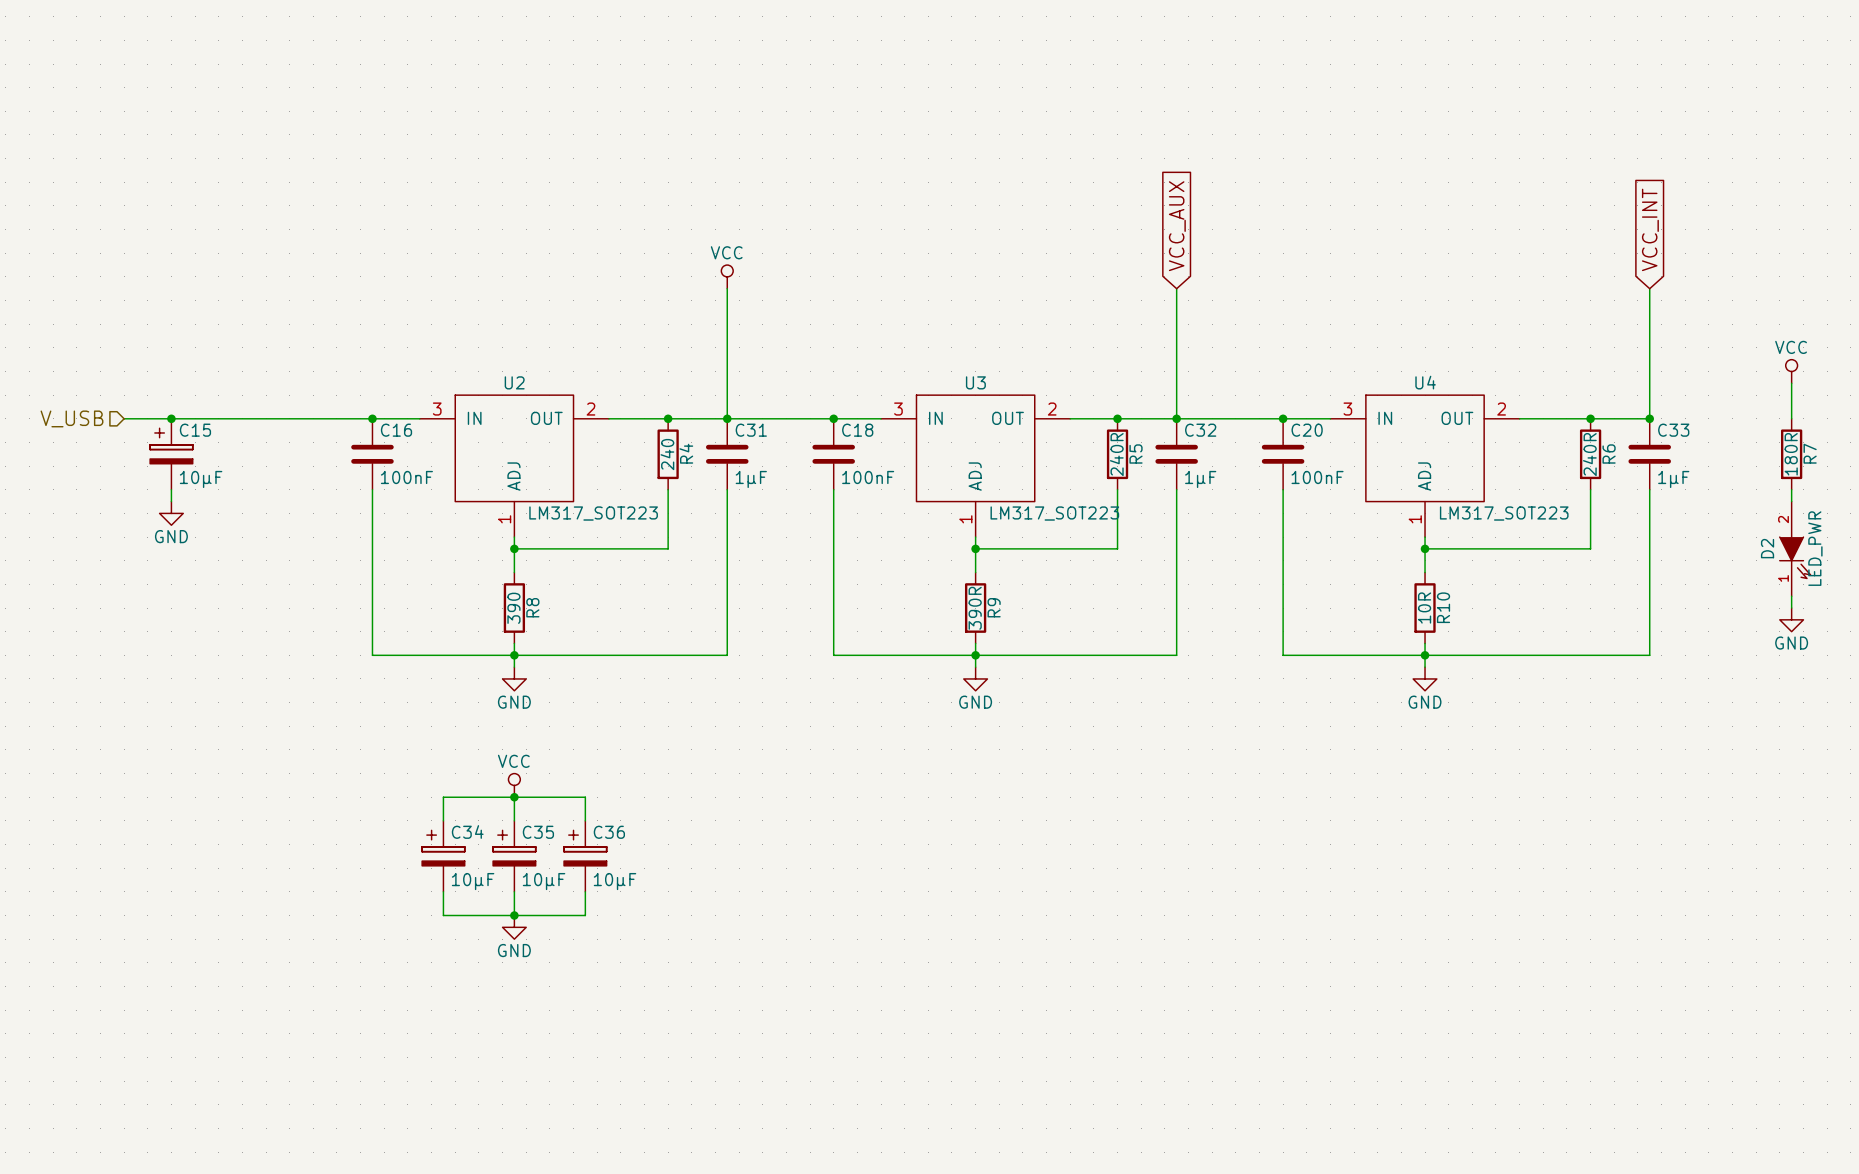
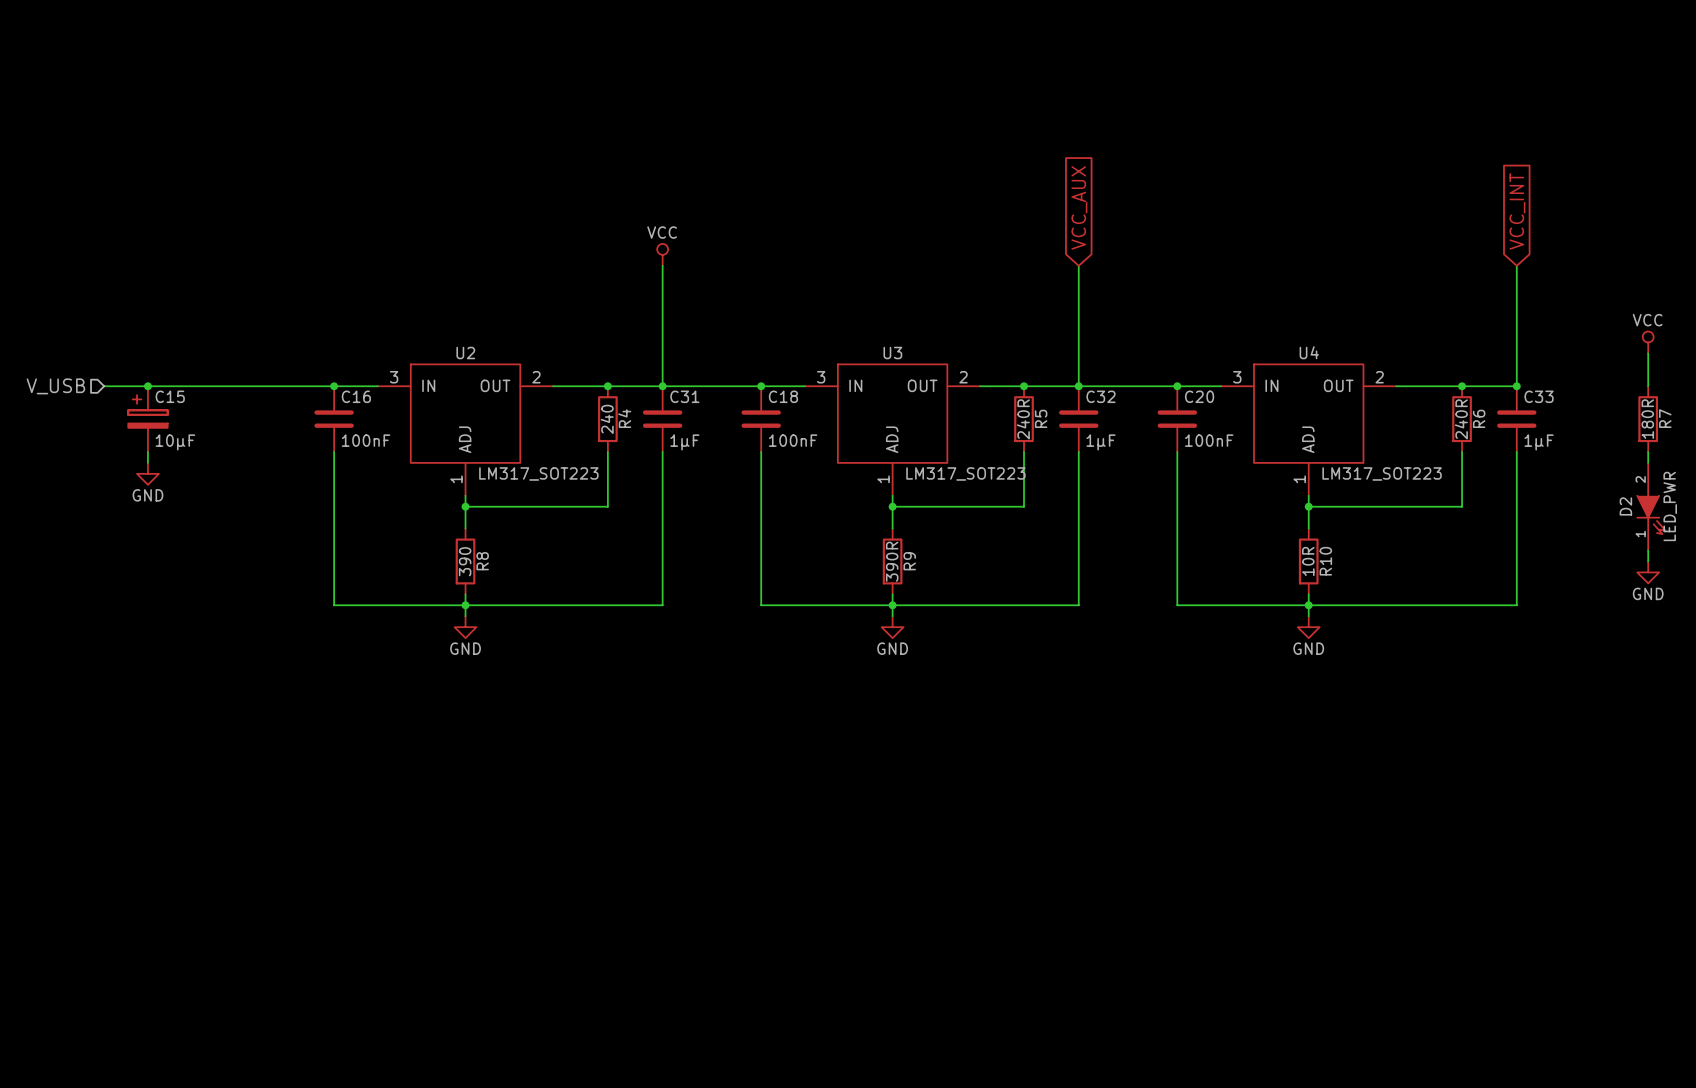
power symbol: VCC (514, 785) -> none
wire: (514, 797) (514, 820) -> none
junction: (514, 797) -> none
wire: (443, 820) (443, 797) (585, 797) (585, 820) -> none
C34: 10µF (443, 856) -> none
C35: 10µF (514, 856) -> none
C36: 10µF (585, 856) -> none
wire: (443, 891) (443, 915) (585, 915) (585, 891) -> none
wire: (514, 891) (514, 915) -> none
junction: (514, 915) -> none
power symbol: GND (514, 927) -> none

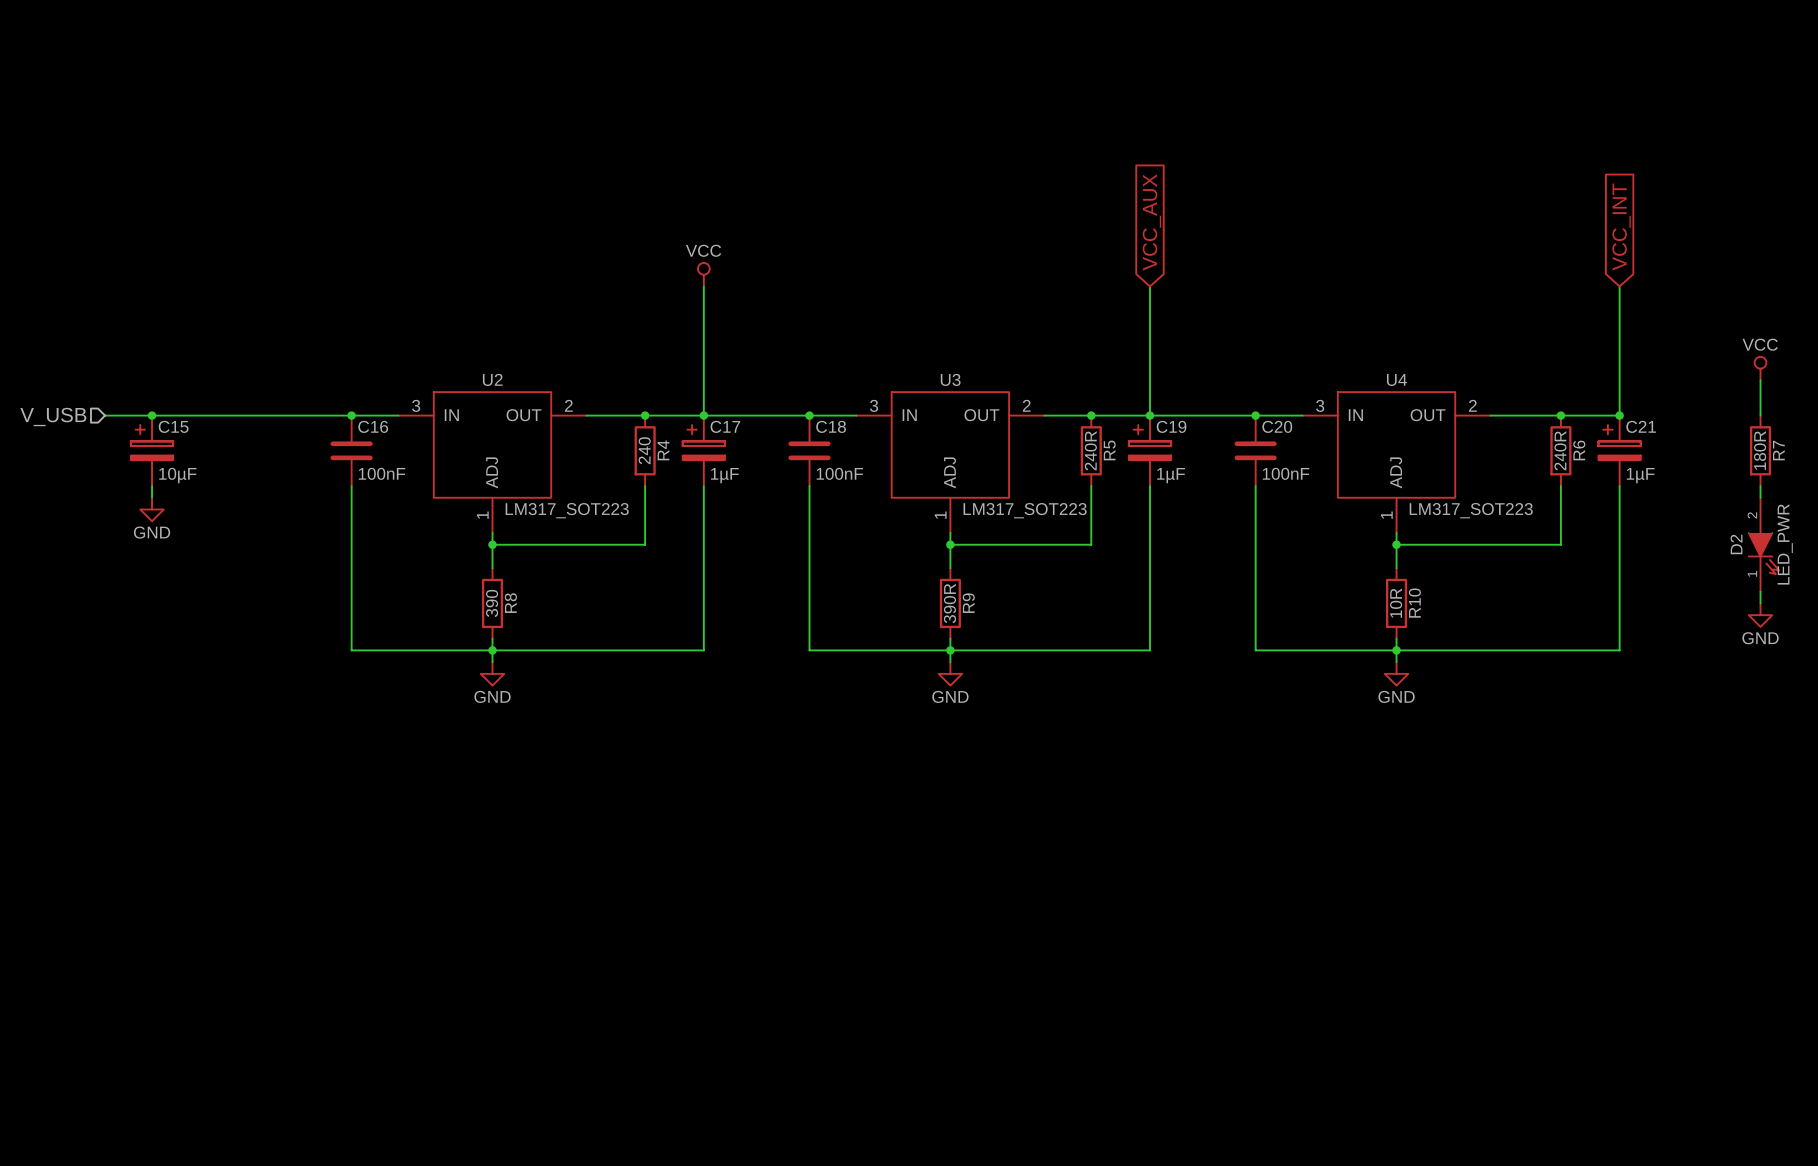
C31: 1µF (662, 419) -> none
C17: none -> 1µF (703, 450)
C32: 1µF (1078, 419) -> none
C19: none -> 1µF (1149, 450)
C33: 1µF (1516, 419) -> none
C21: none -> 1µF (1619, 450)

